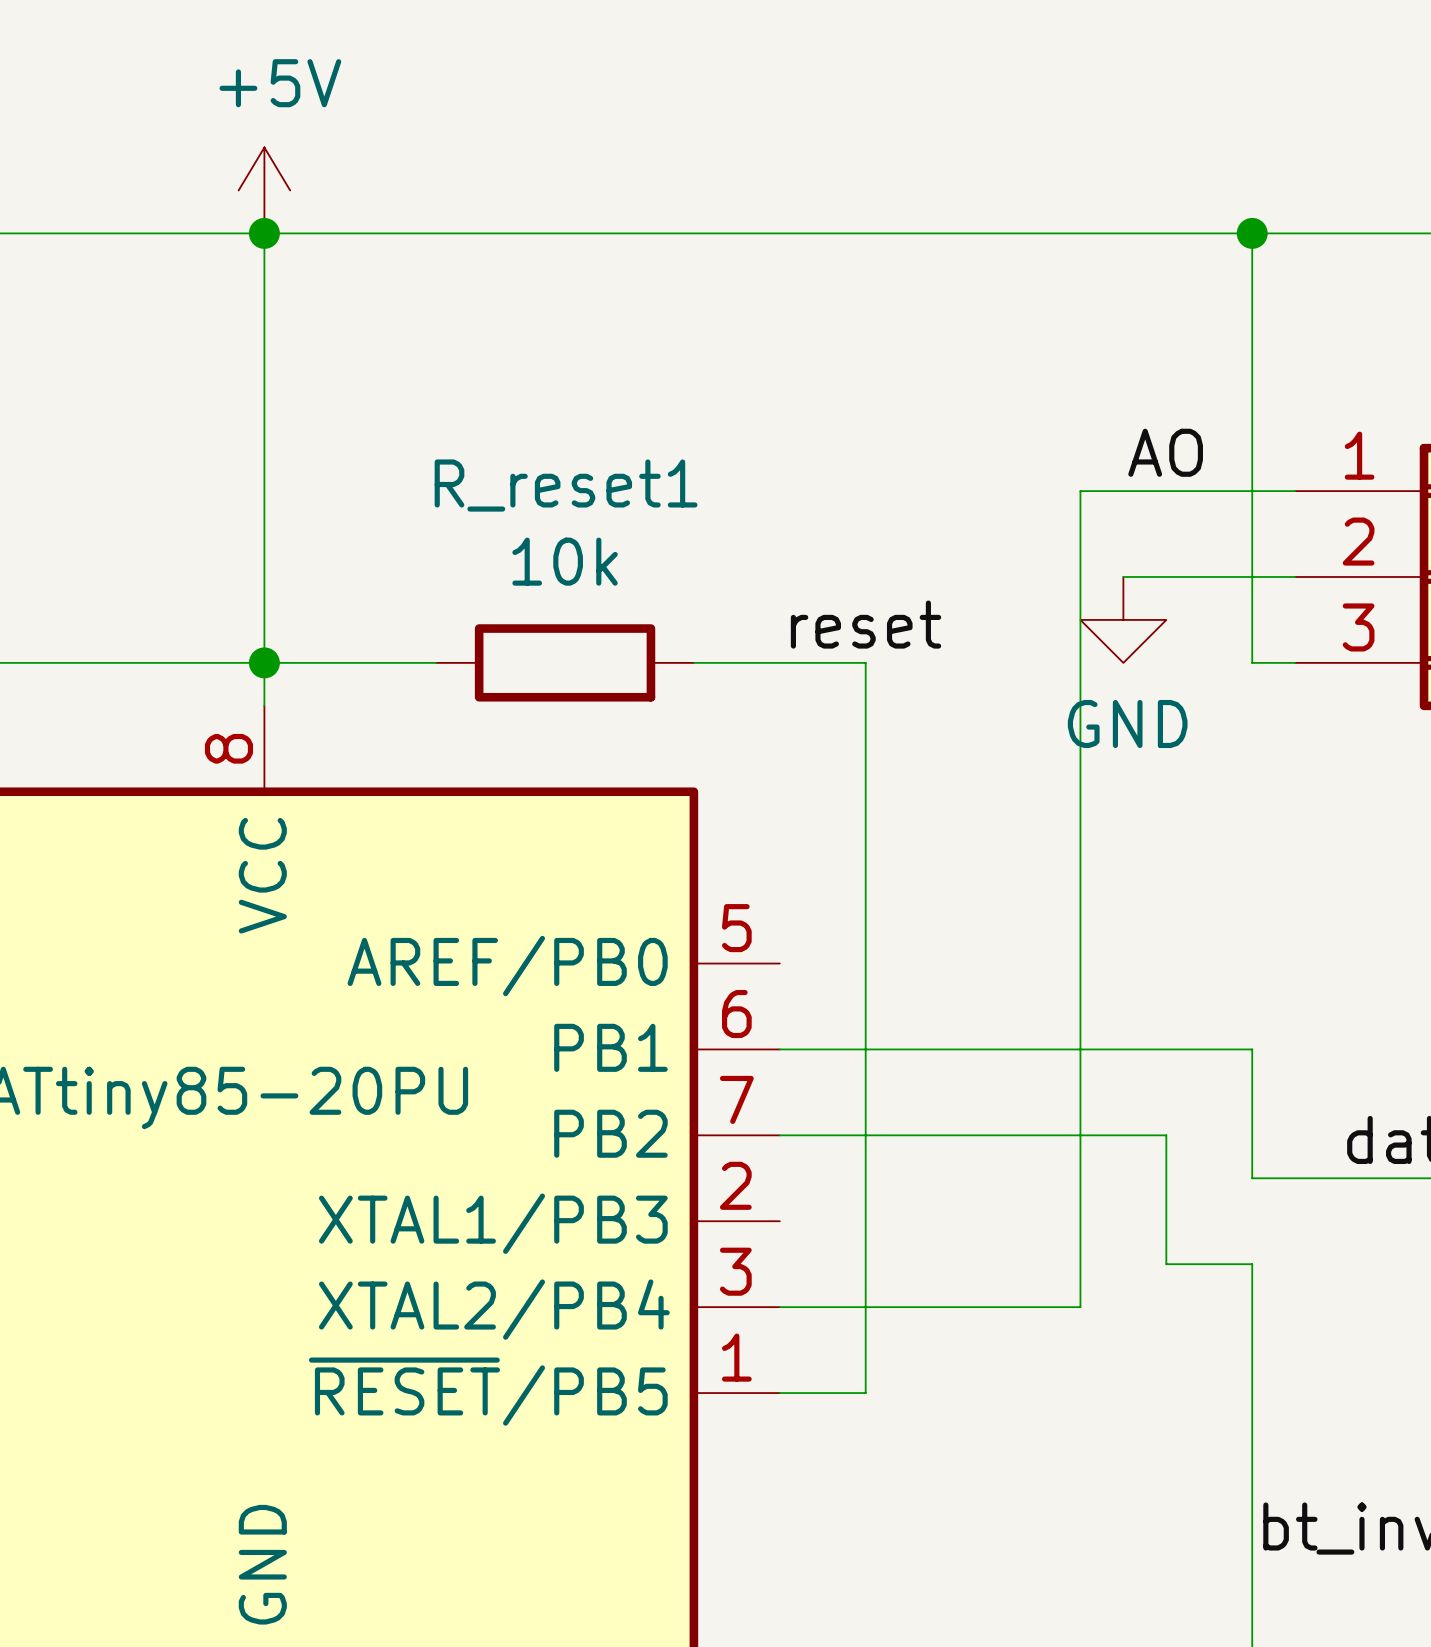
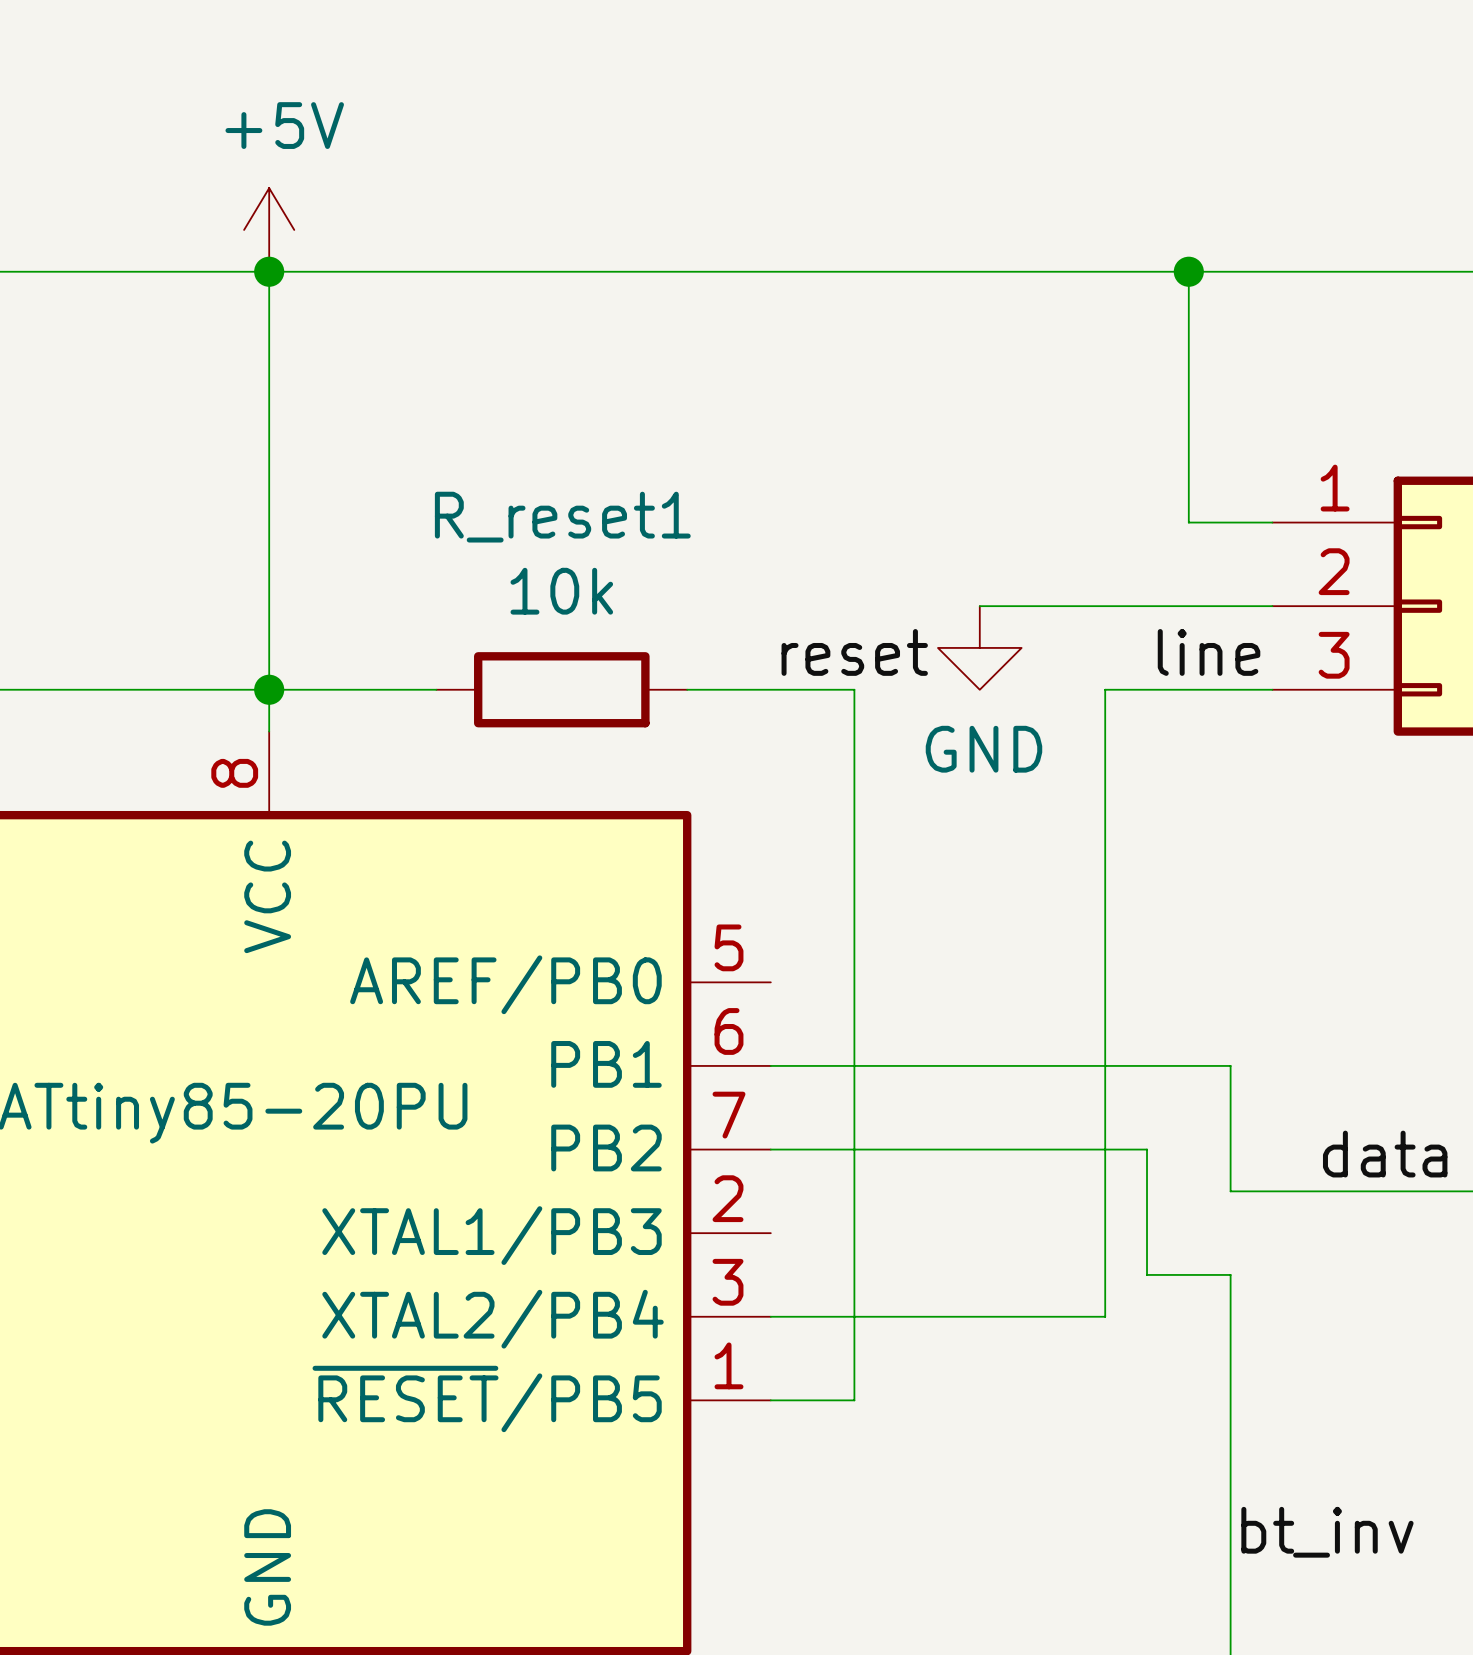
wire: none -> (1188, 271) (1188, 522)
wire: (1252, 233) (1252, 662) -> none
junction position: (1252, 233) -> (1188, 271)
label: AO (1165, 452) -> none
wire: (1209, 491) (1080, 491) (1080, 1307) -> (1230, 689) (1105, 689) (1105, 1316) (1063, 1316)
wire: none -> (979, 606) (1105, 606)
power symbol position: GND (1123, 619) -> GND (979, 647)
label: none -> line (1209, 652)

